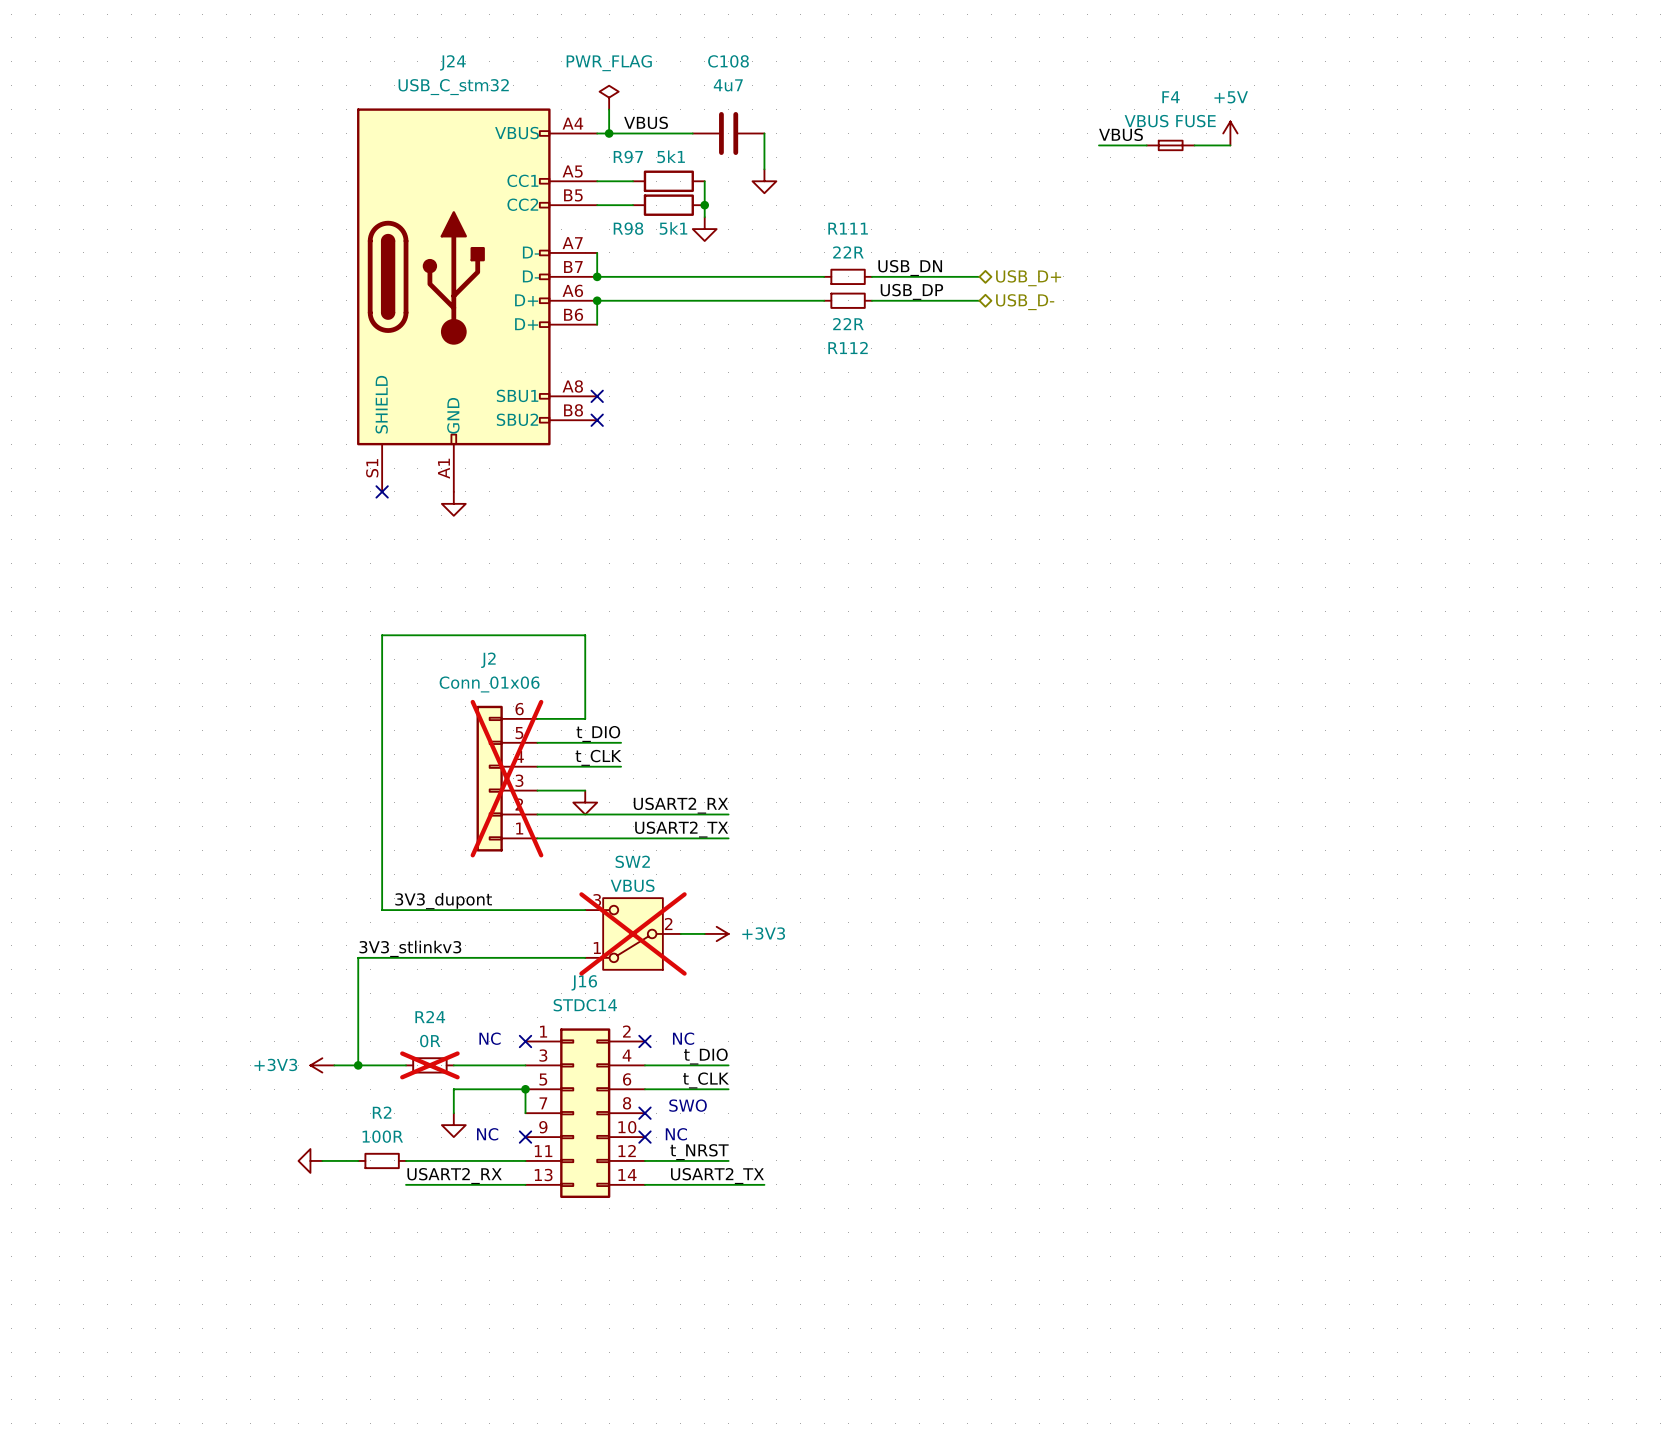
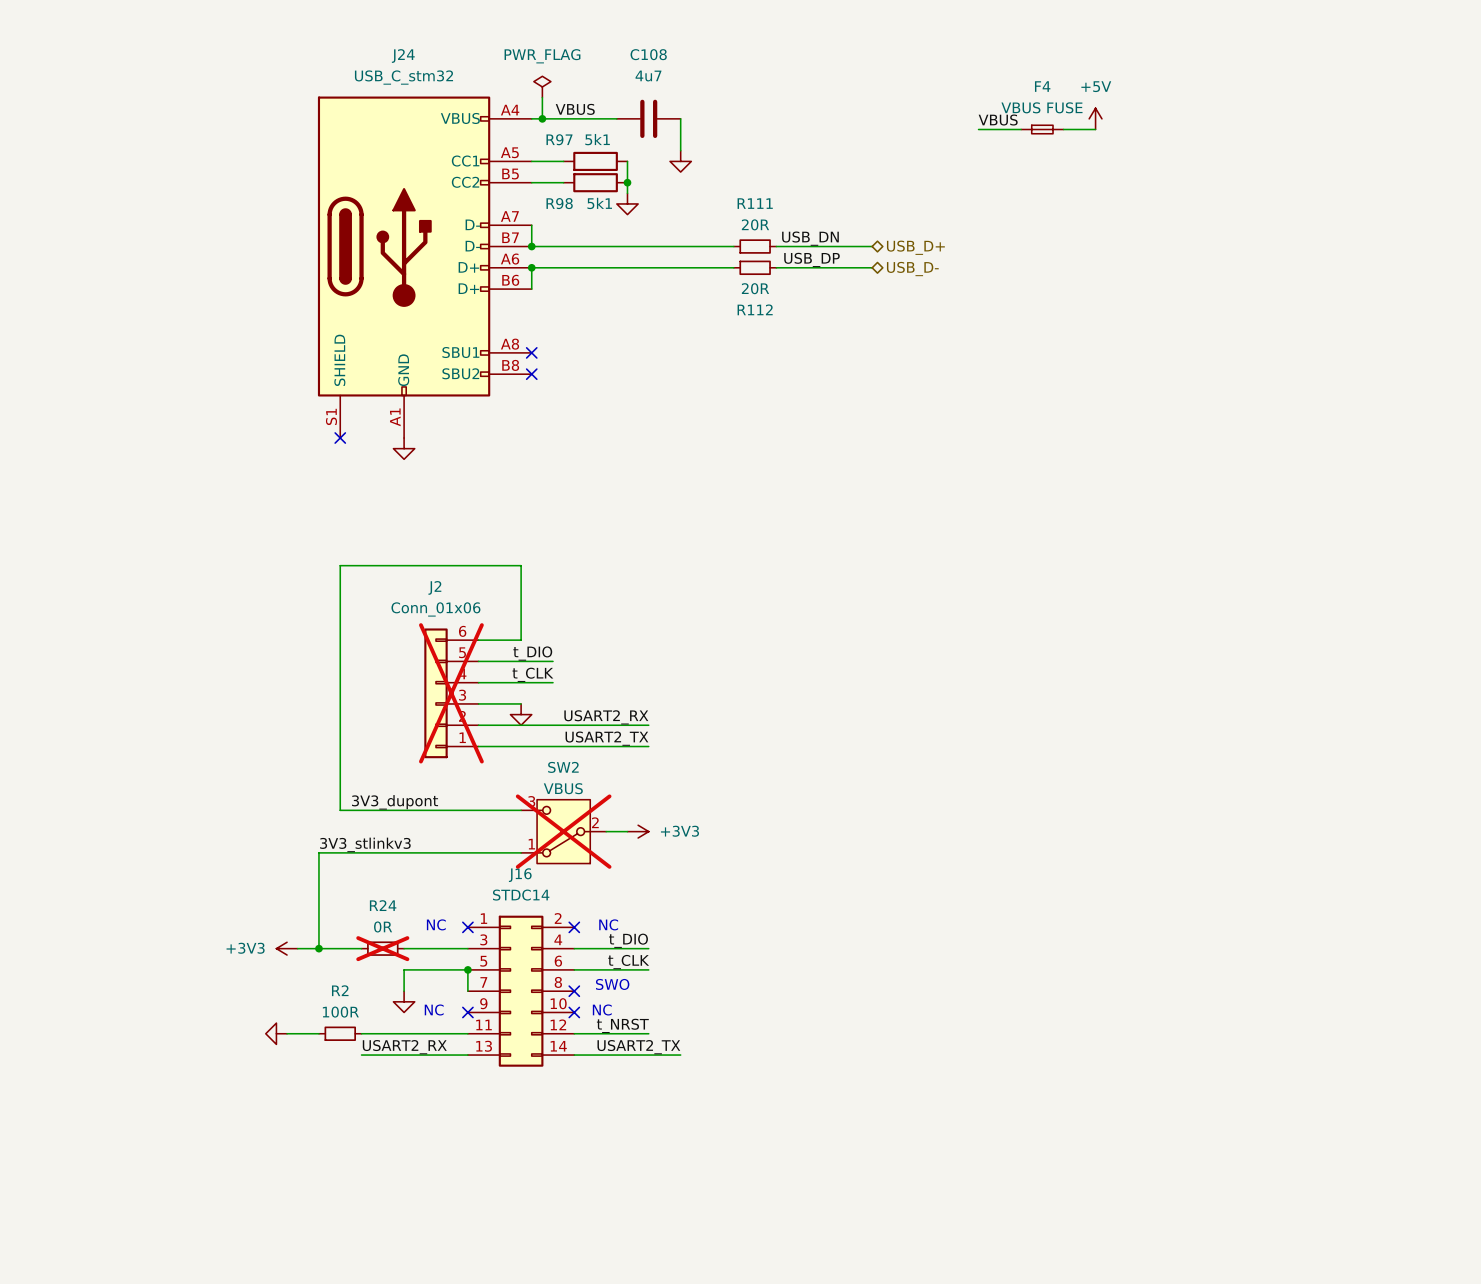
R111 value: 22R (848, 252) -> 20R (755, 224)
R112 value: 22R (848, 324) -> 20R (755, 288)

